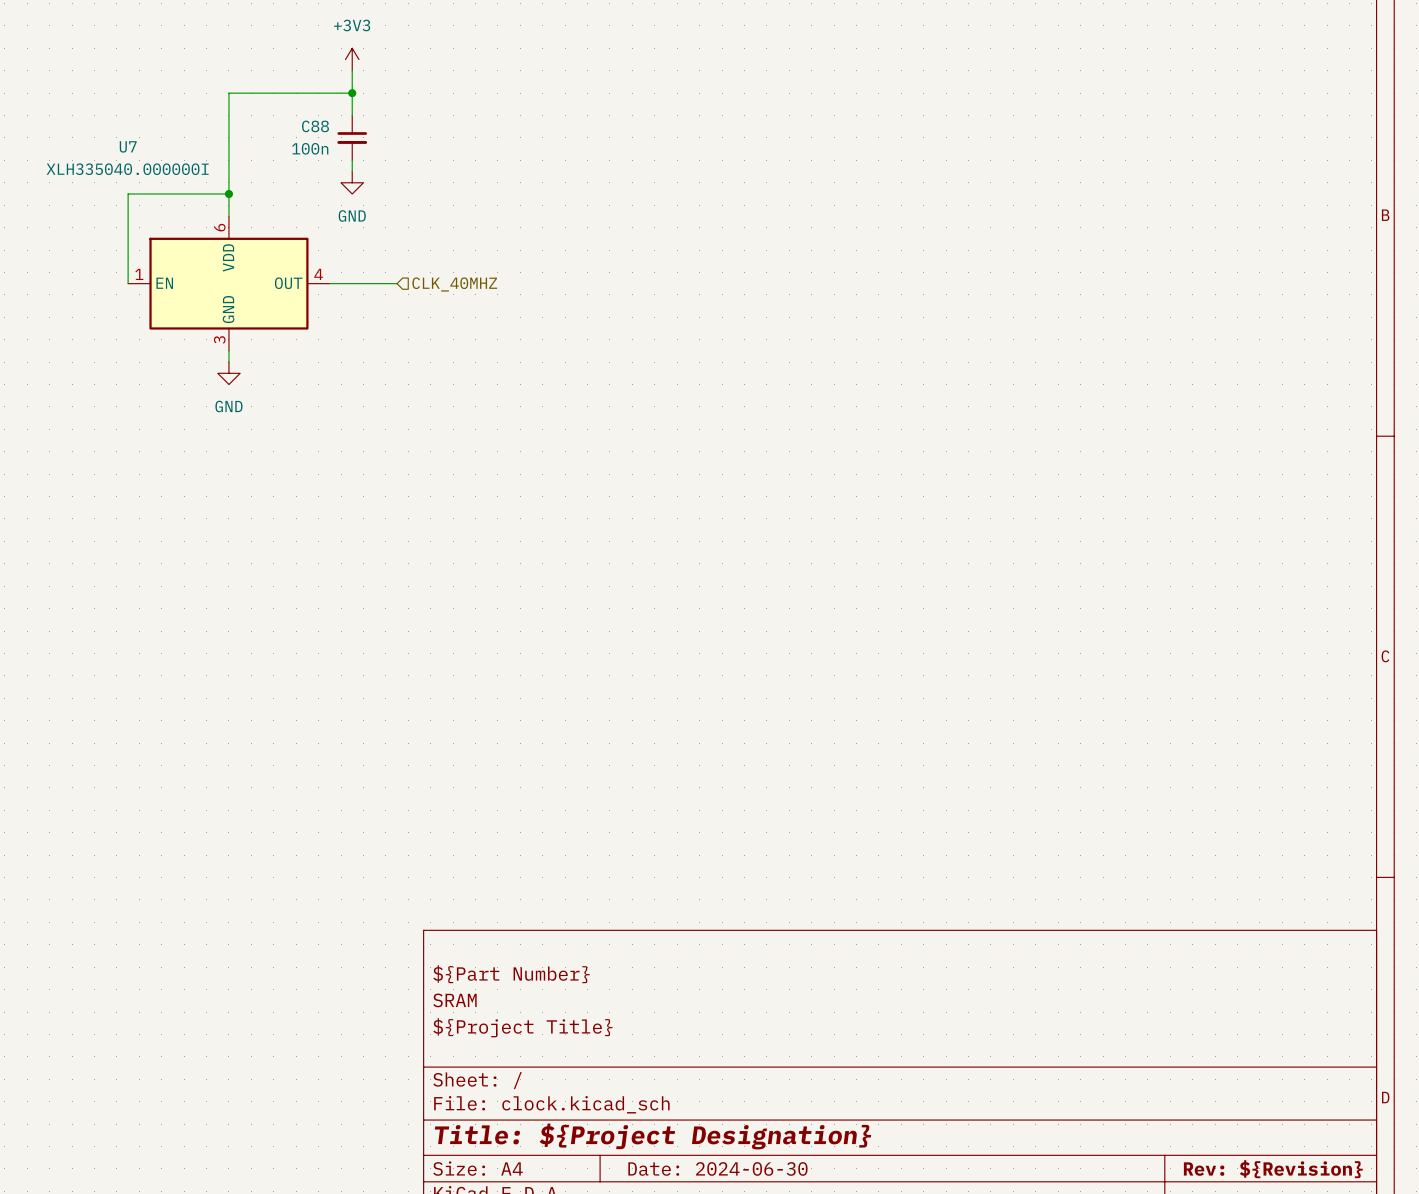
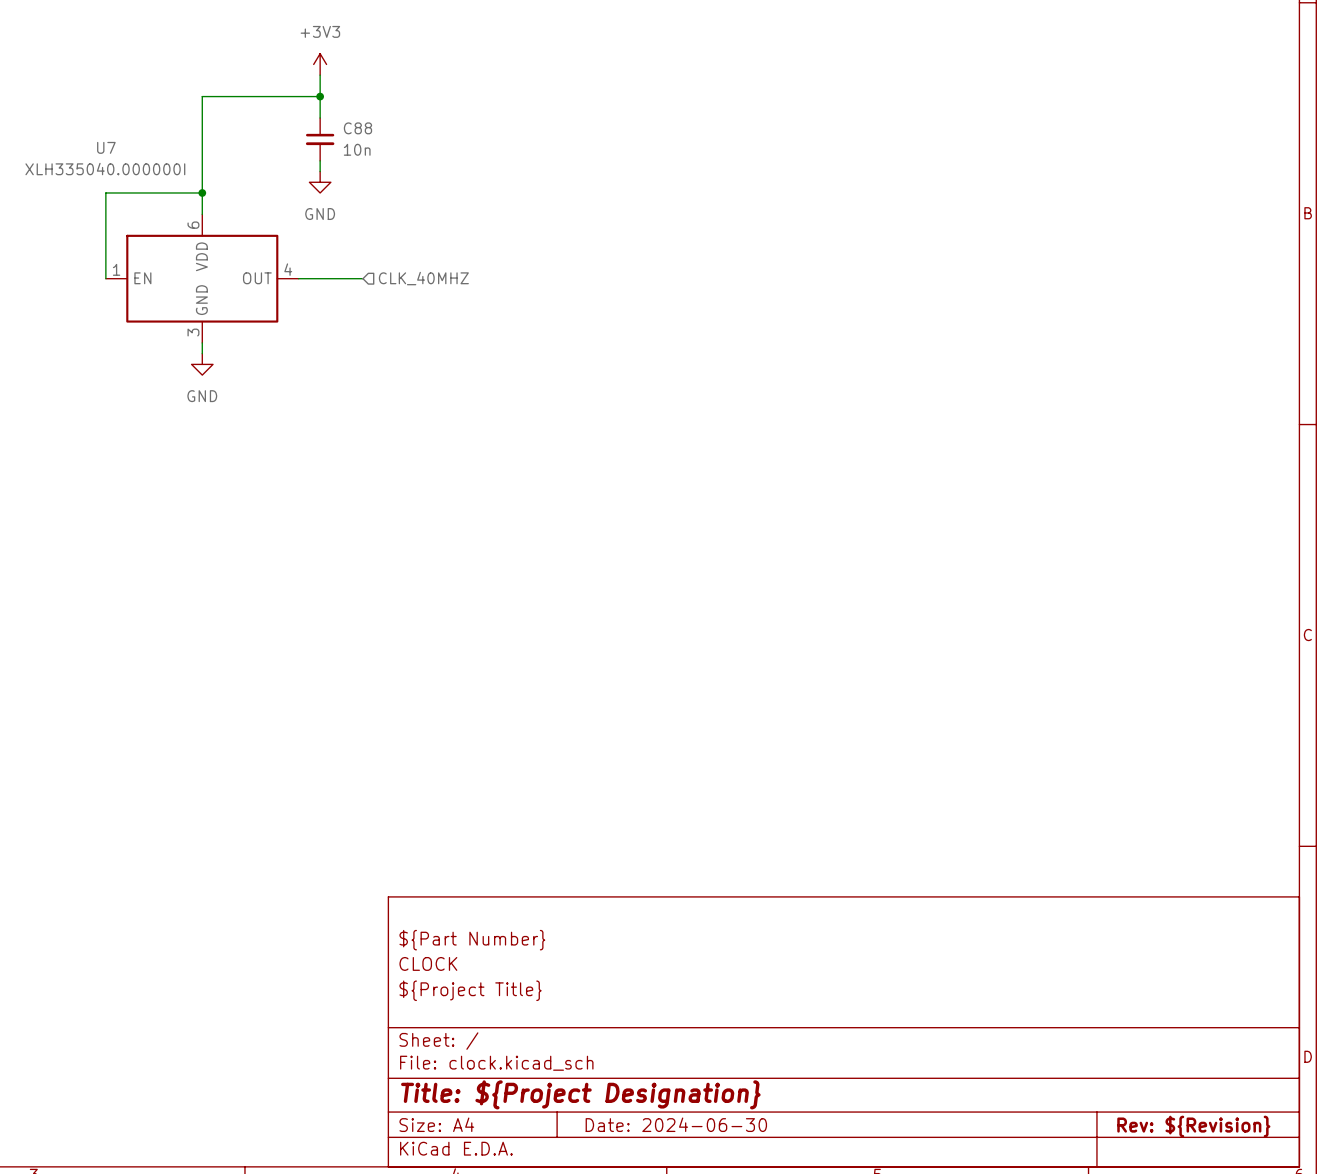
C88 name position: C88 (315, 126) -> C88 (357, 128)
C88 value: 100n (310, 148) -> 10n (357, 149)
title block: SRAM (454, 1000) -> CLOCK (428, 963)

